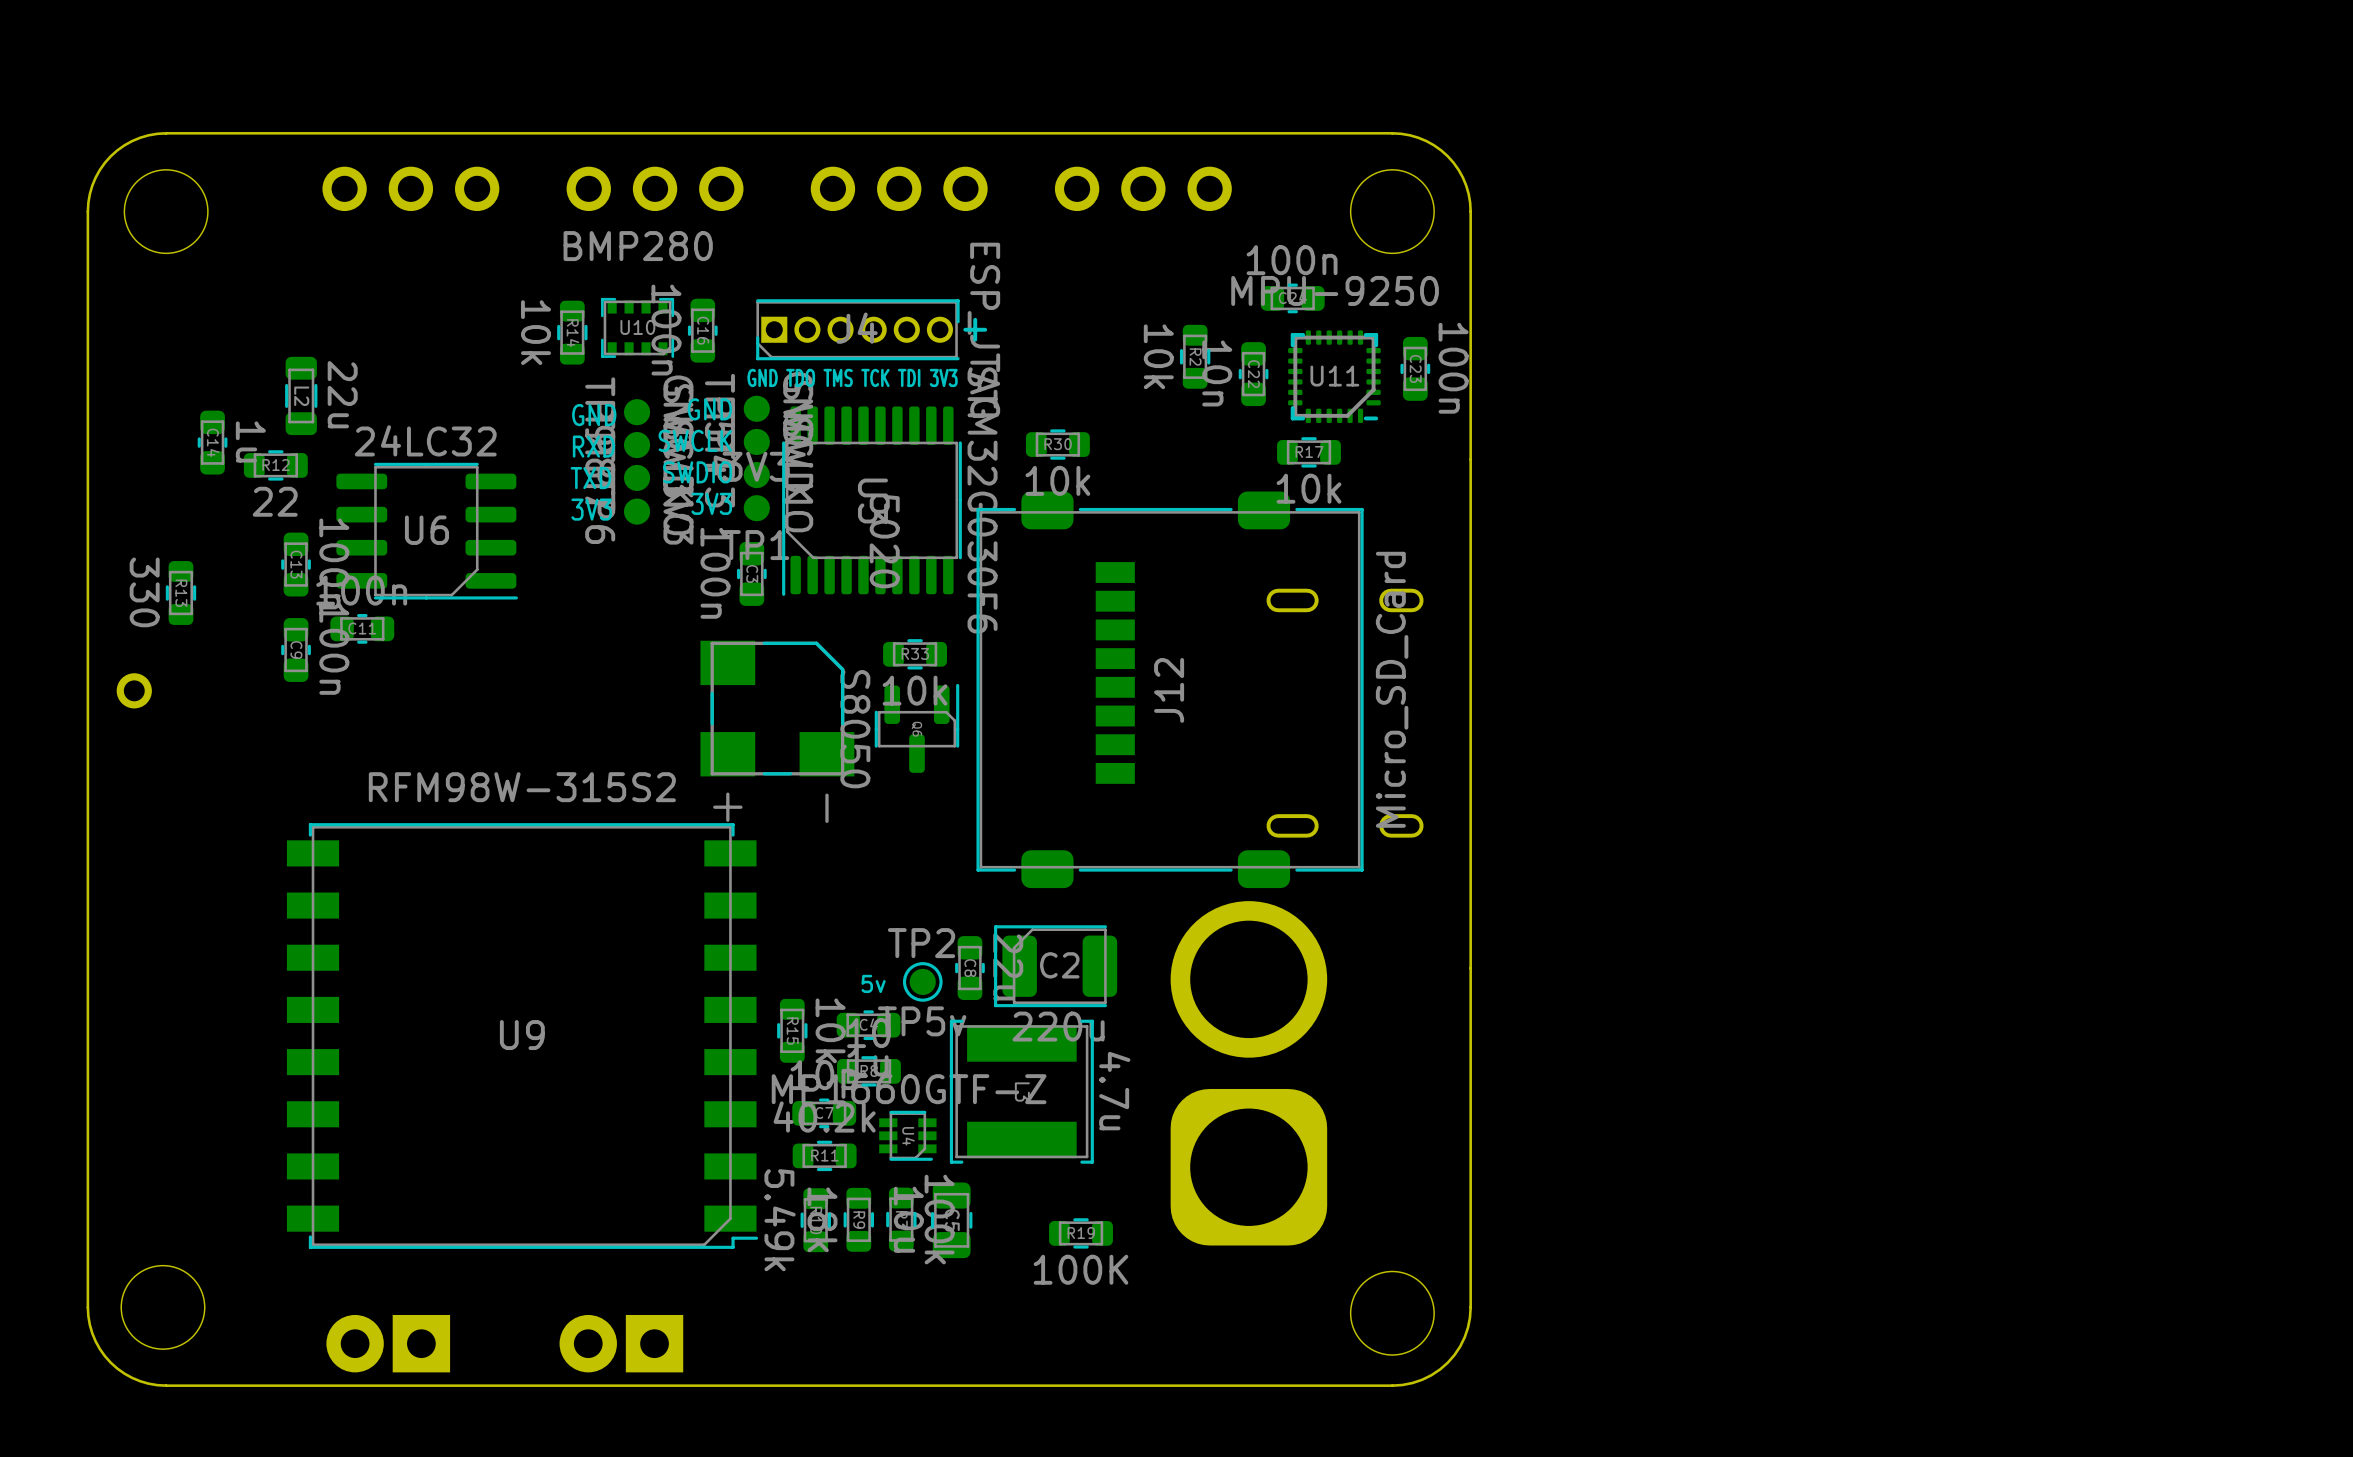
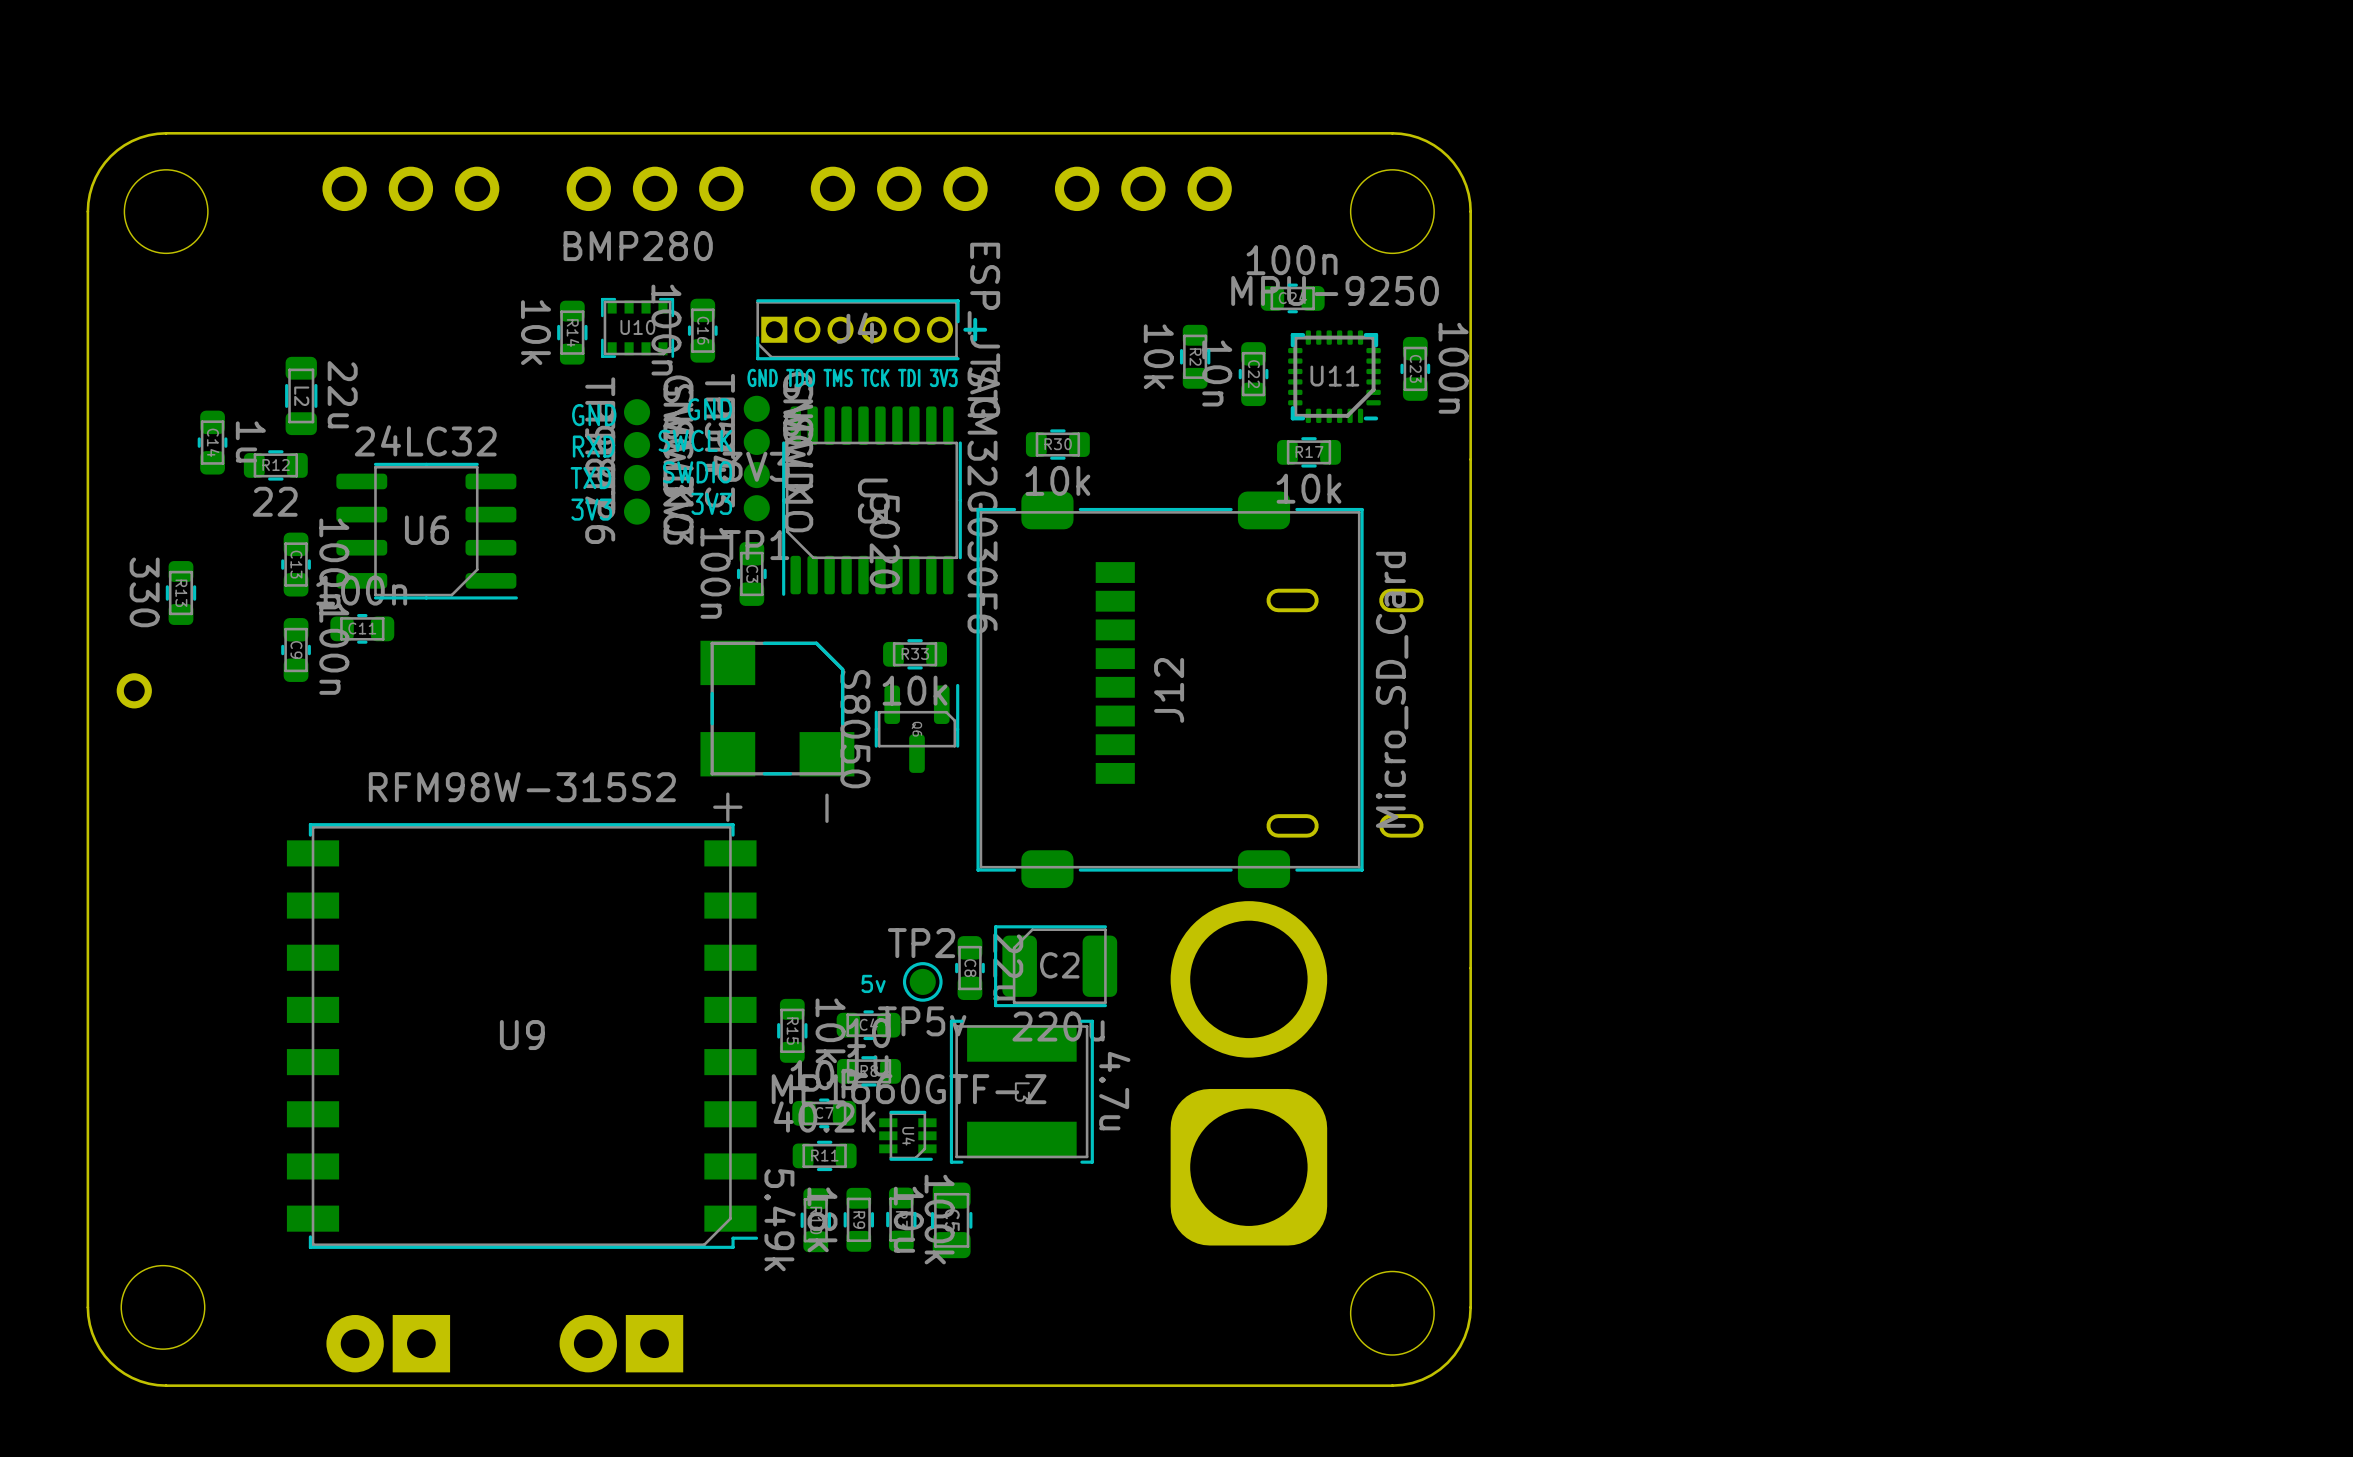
R19: 100K (1081, 1233) -> none

